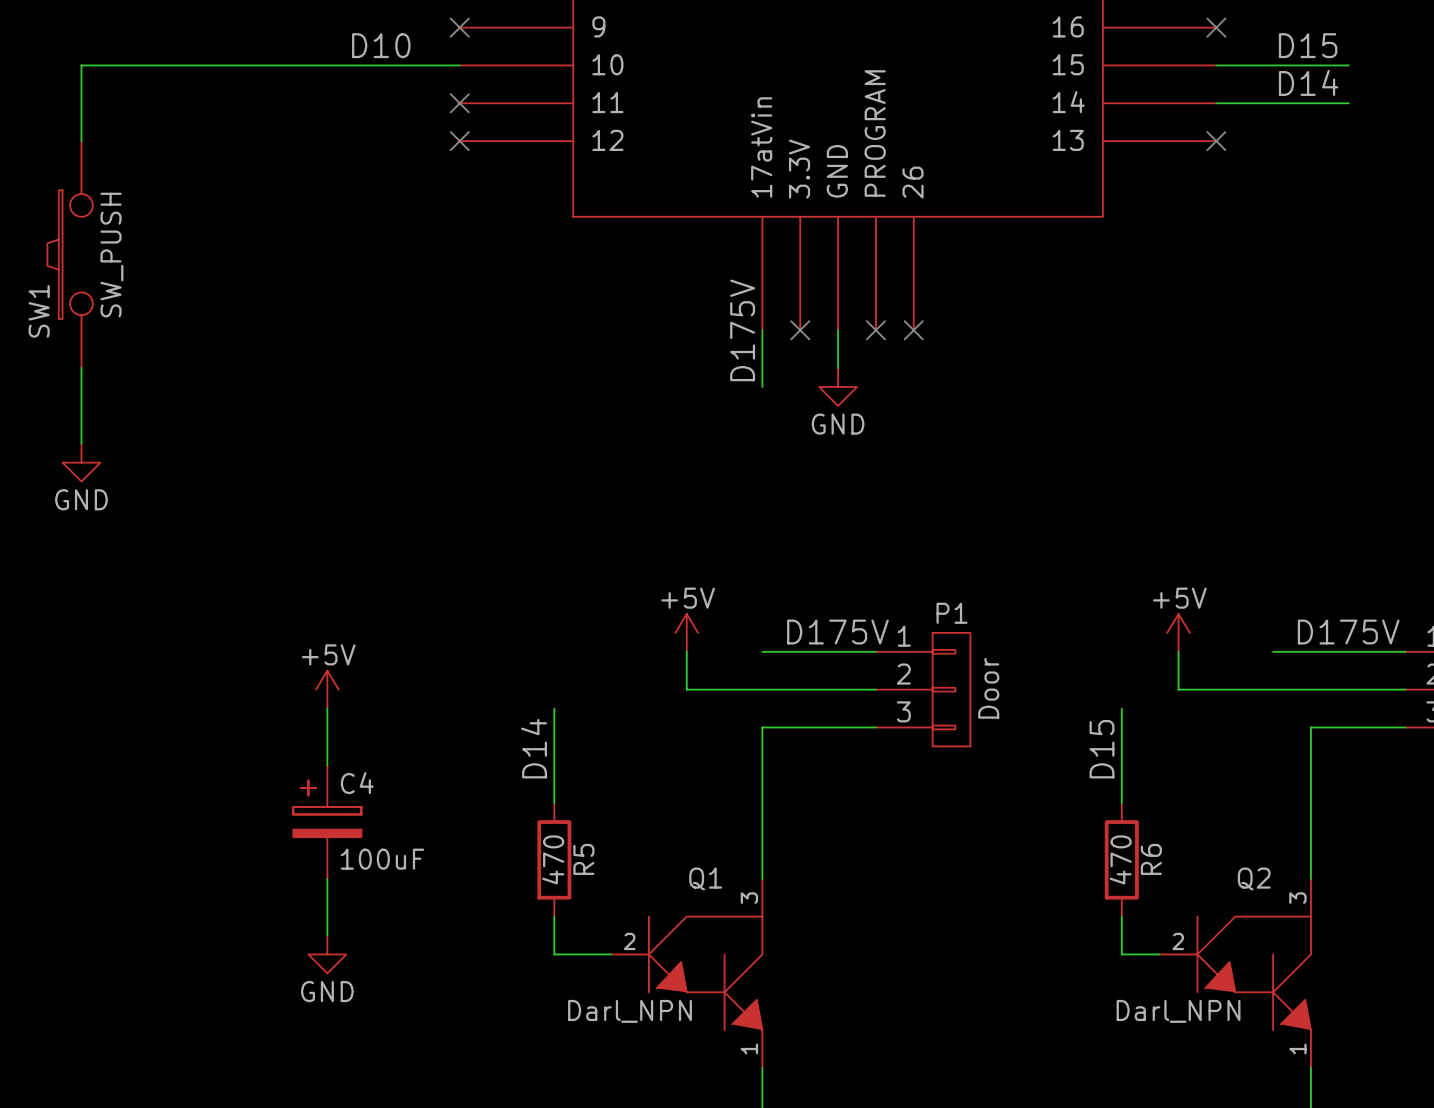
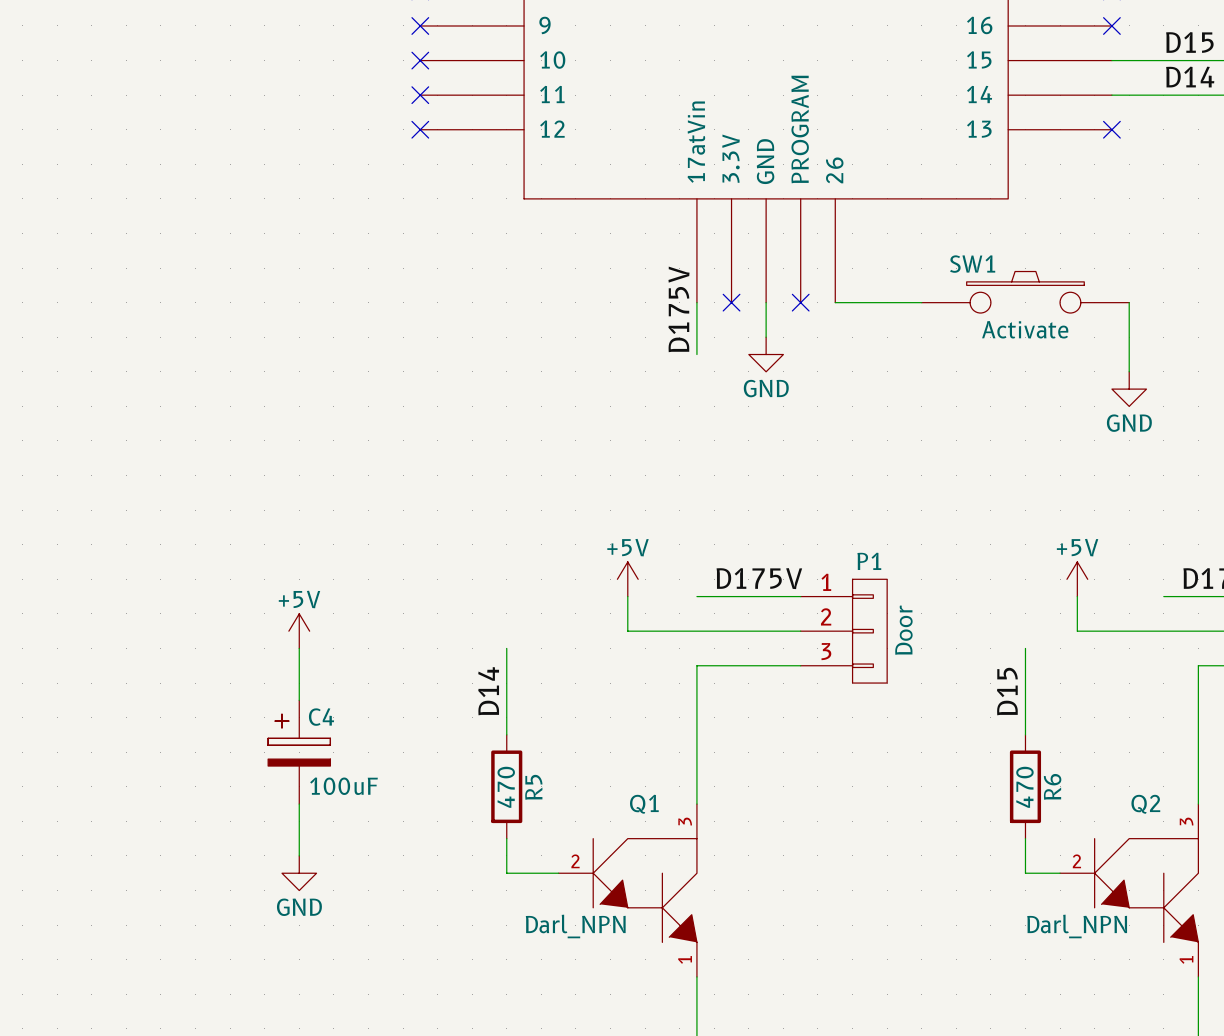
label: D10 (381, 45) -> none
wire: (459, 65) (81, 65) (81, 141) -> none
no-connect mark: none -> (420, 60)
SW1 rotation: 0° (54, 254) -> 90° clockwise (1025, 278)
SW1 position: (70, 254) -> (1025, 292)
SW1 value: SW_PUSH (111, 255) -> Activate (1025, 329)
wire: none -> (835, 302) (921, 302)
no-connect mark: (913, 330) -> none
wire: none -> (1129, 302) (1129, 371)
wire: (81, 368) (81, 443) -> none
power symbol: none -> GND (1129, 389)
power symbol: GND (81, 462) -> none

